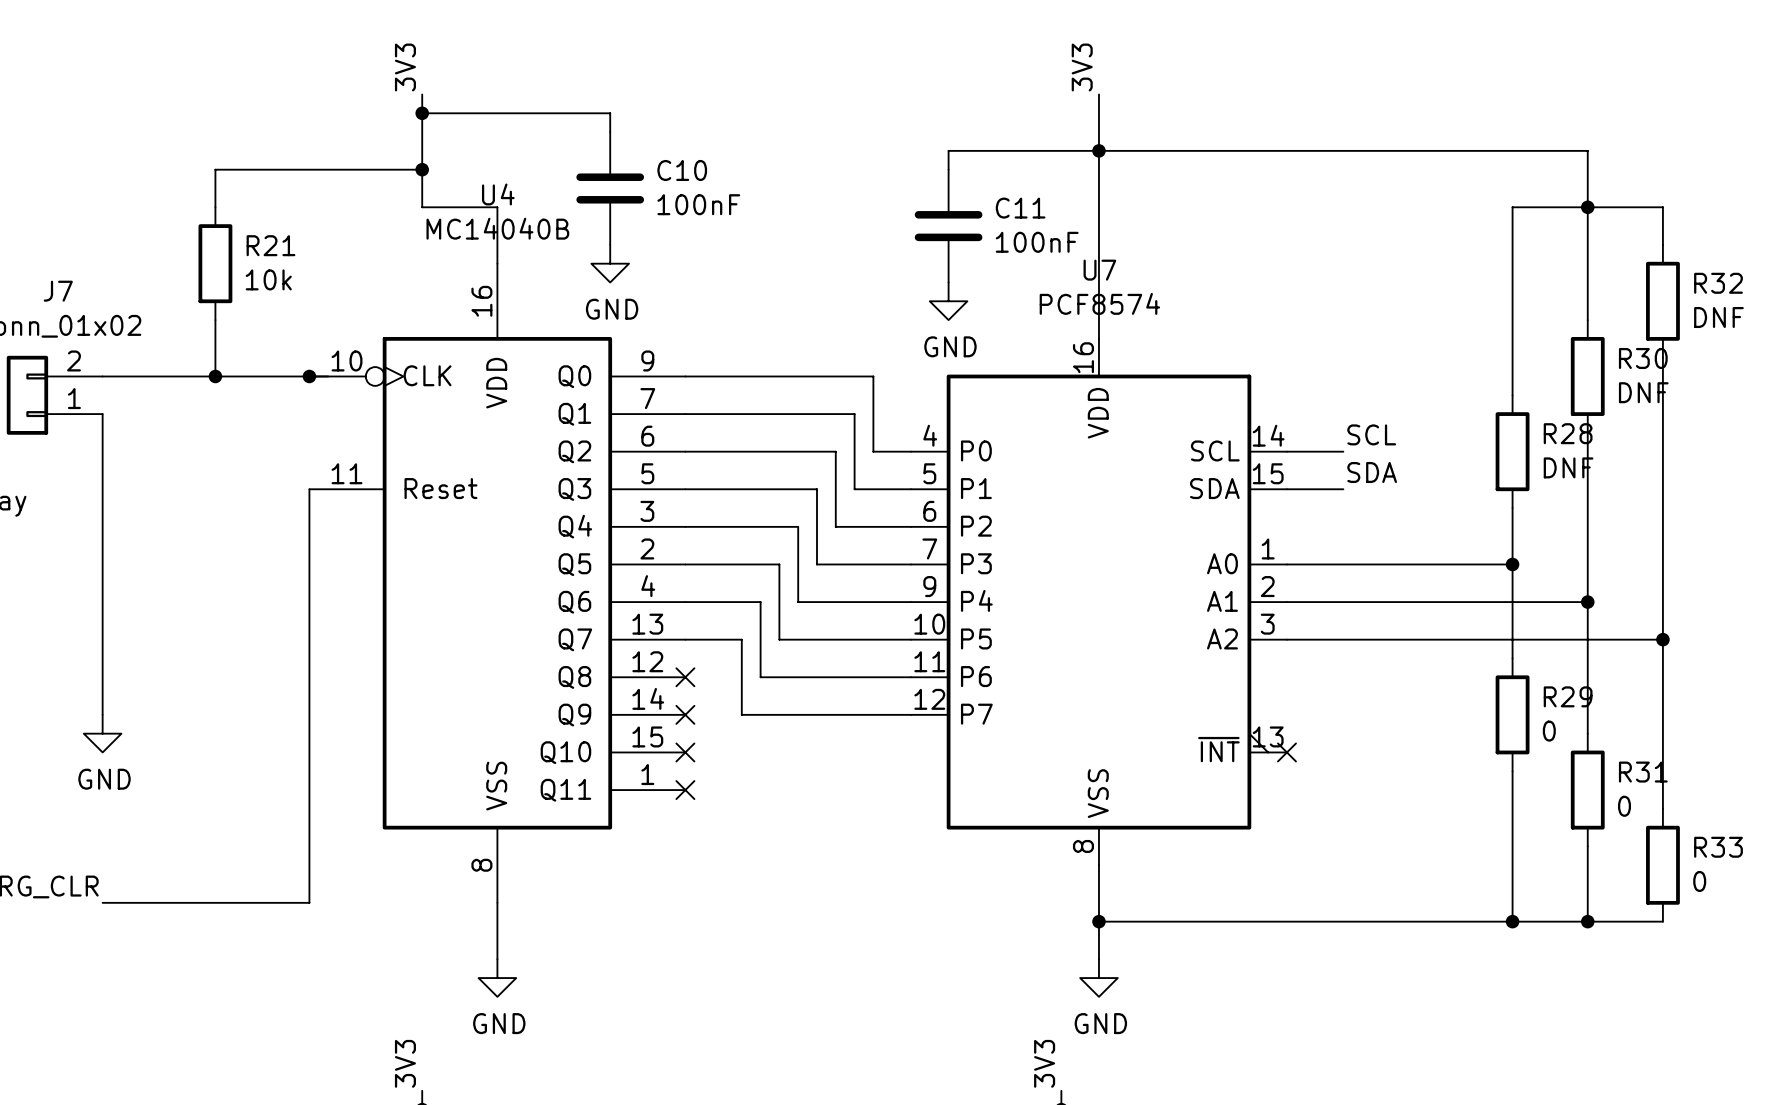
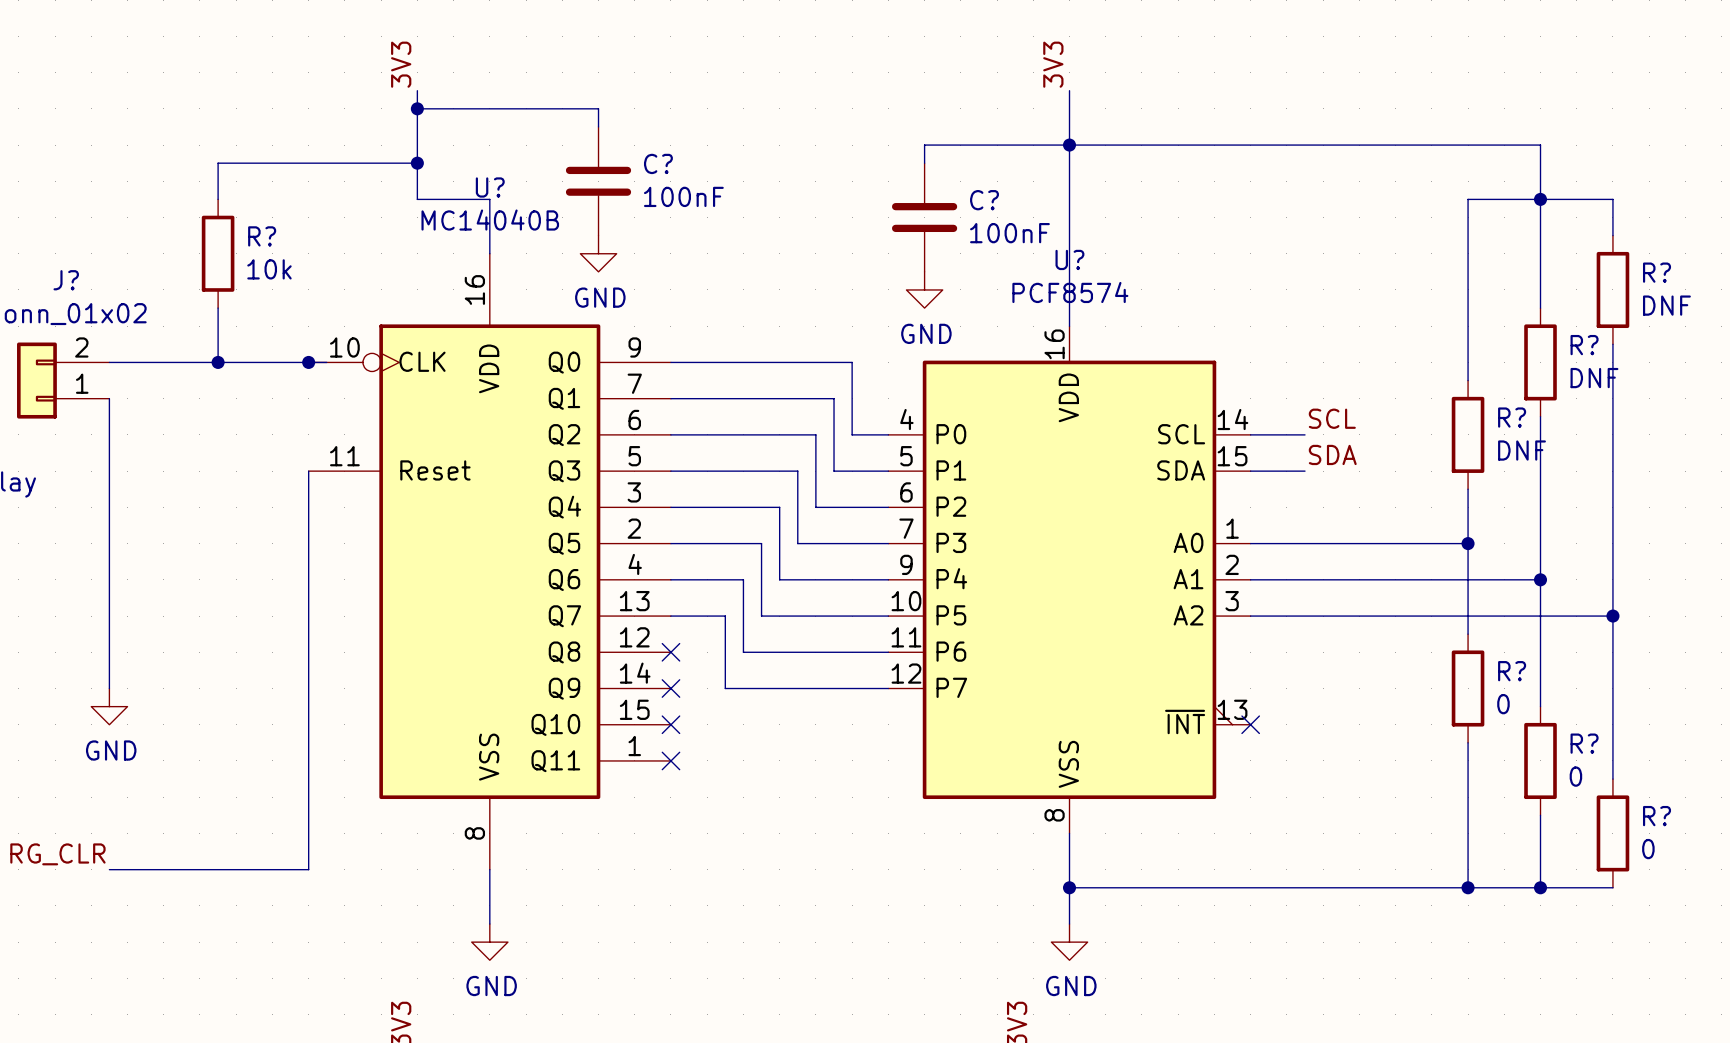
C10 name: C10 (682, 170) -> C? (658, 163)
U4 name: U4 (498, 194) -> U? (490, 187)
C11 name: C11 (1020, 208) -> C? (984, 200)
R21 name: R21 (270, 245) -> R? (262, 236)
U7 name: U7 (1099, 270) -> U? (1069, 259)
R32 name: R32 (1718, 283) -> R? (1657, 272)
J7 name: J7 (58, 291) -> J? (66, 280)
R30 name: R30 (1643, 358) -> R? (1584, 345)
R28 name: R28 (1568, 433) -> R? (1512, 417)
R29 name: R29 (1568, 696) -> R? (1512, 671)
R31 name: R31 (1643, 772) -> R? (1584, 743)
R33 name: R33 (1718, 847) -> R? (1657, 816)

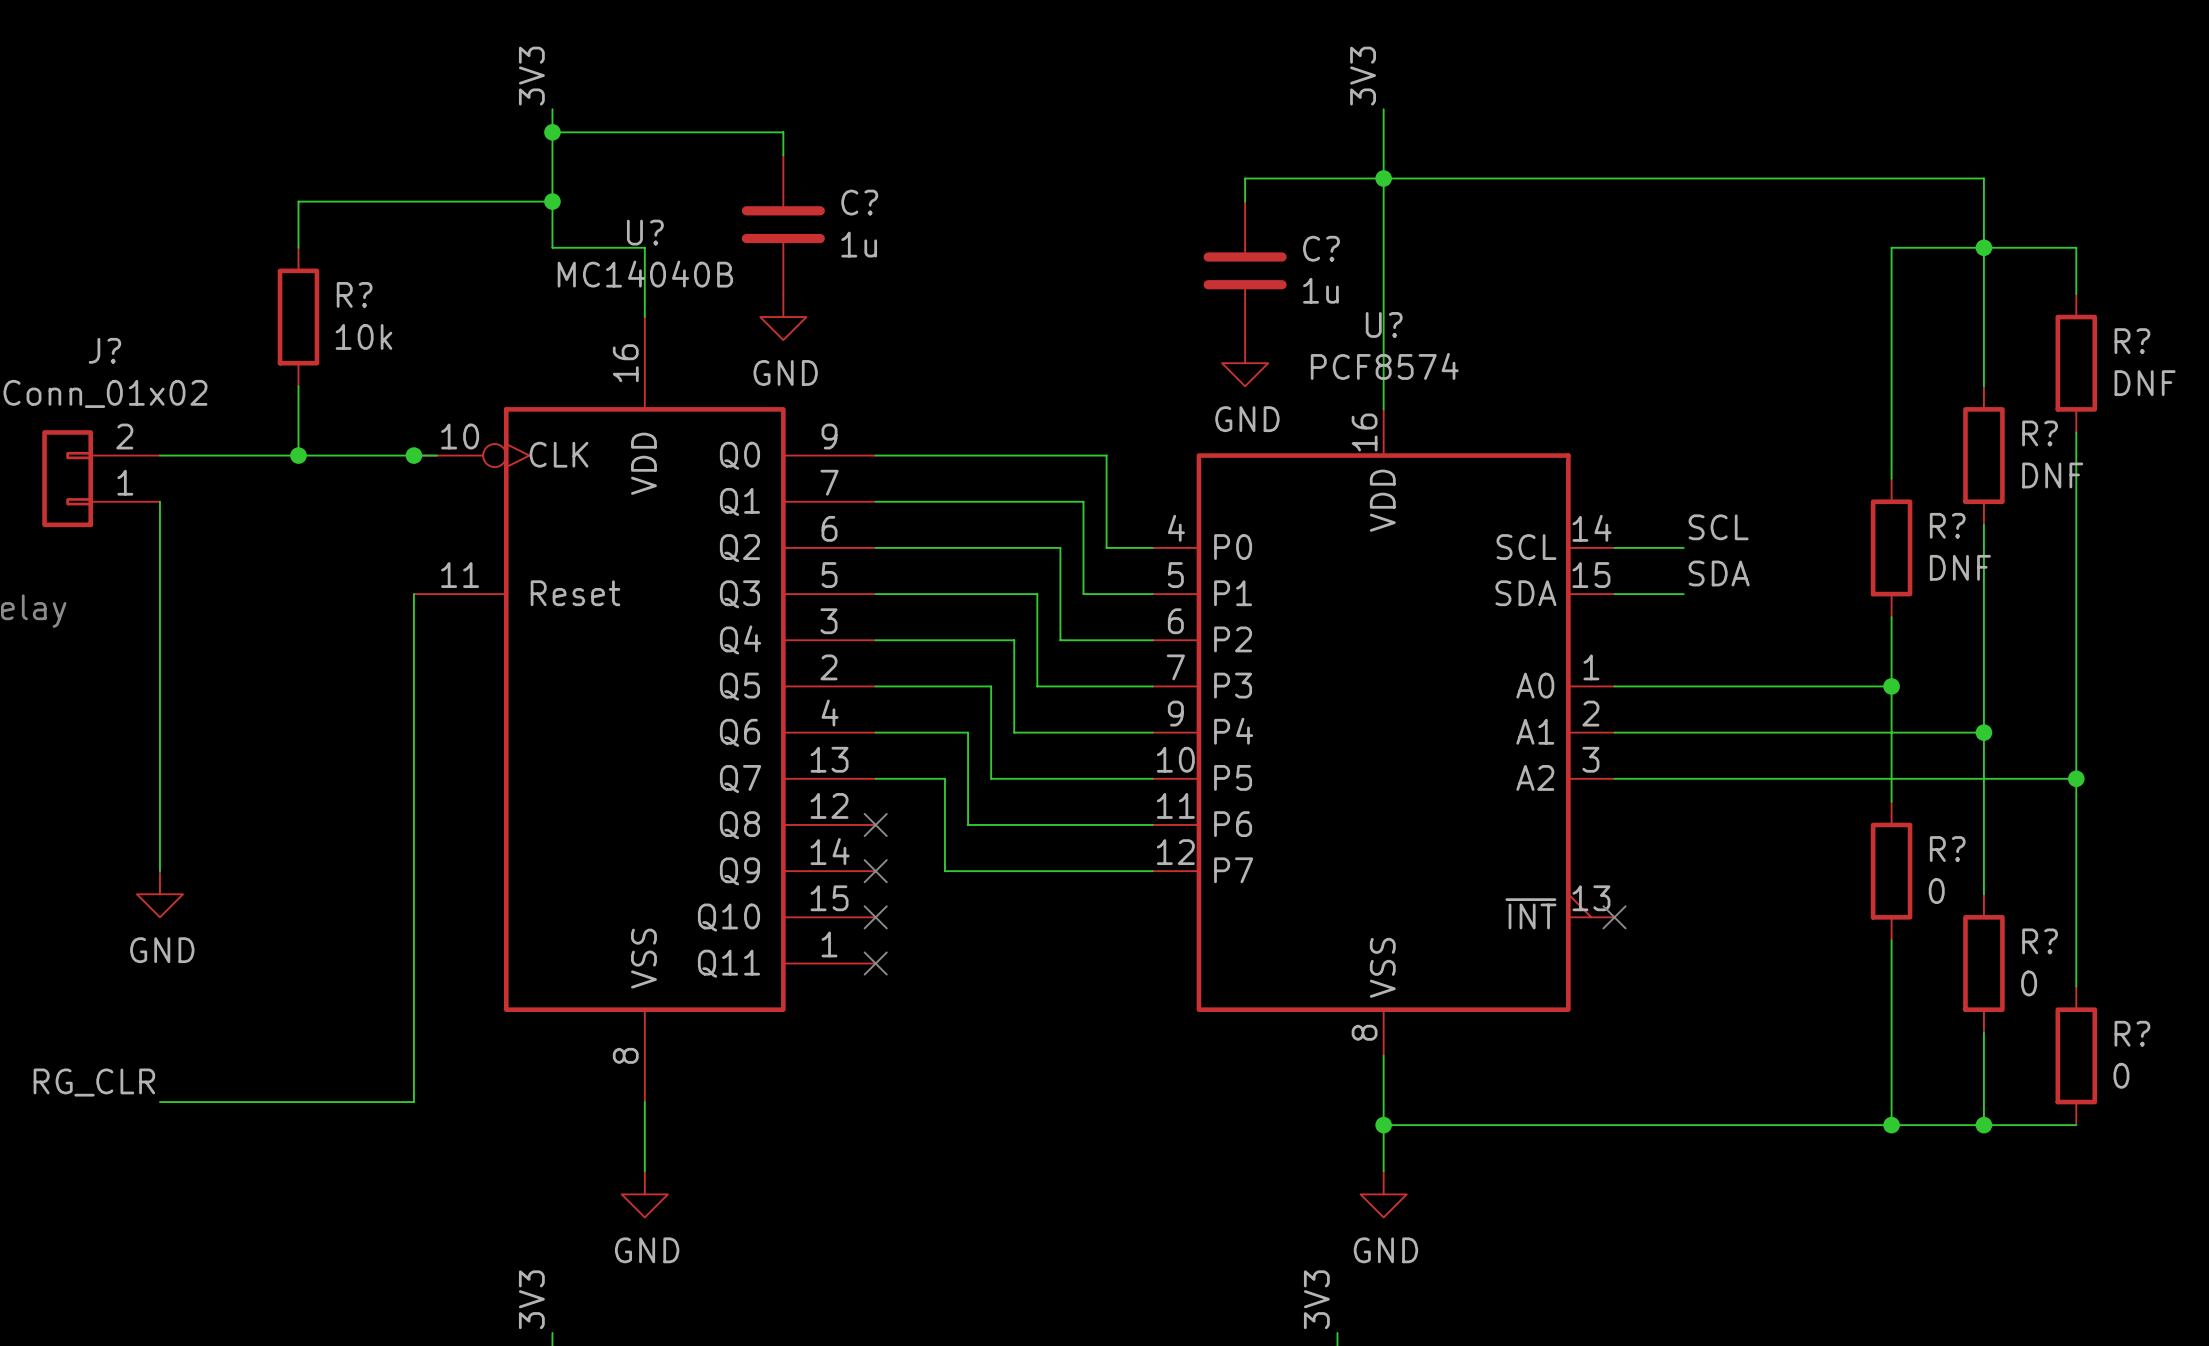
wire: (960, 145) (924, 145) (924, 163) -> (1245, 178) (1245, 201)
C? value: 100nF (683, 196) -> 1u (859, 244)
C?: 100nF (924, 217) -> none
C?: none -> 1u (1245, 270)
power symbol position: GND (924, 289) -> GND (1245, 363)

